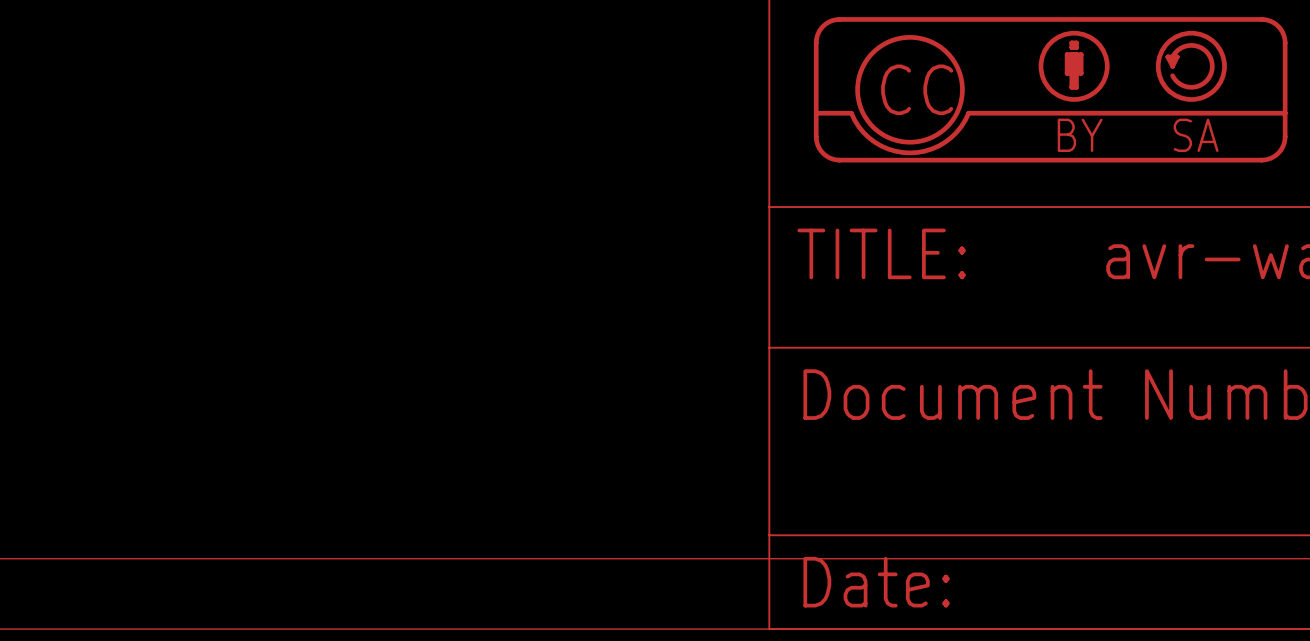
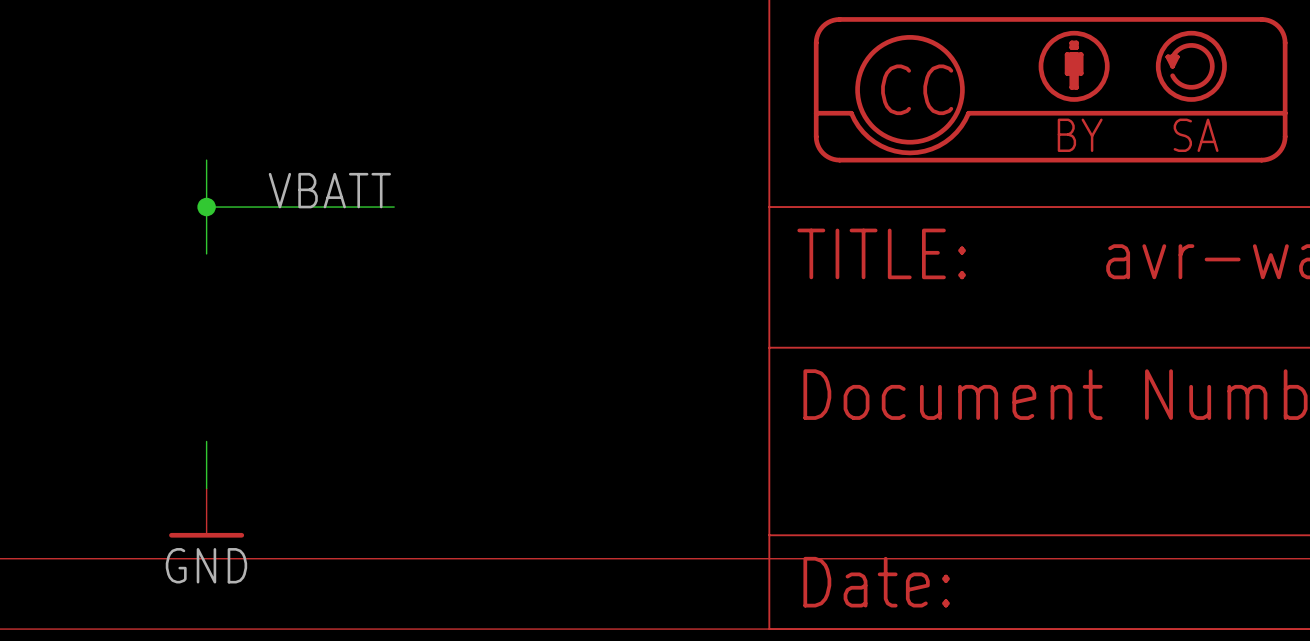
wire: none -> (206, 160) (206, 253)
label: none -> VBATT (329, 190)
wire: none -> (206, 207) (394, 207)
junction: none -> (206, 207)
wire: none -> (206, 441) (206, 488)
power symbol: none -> GND (206, 513)

